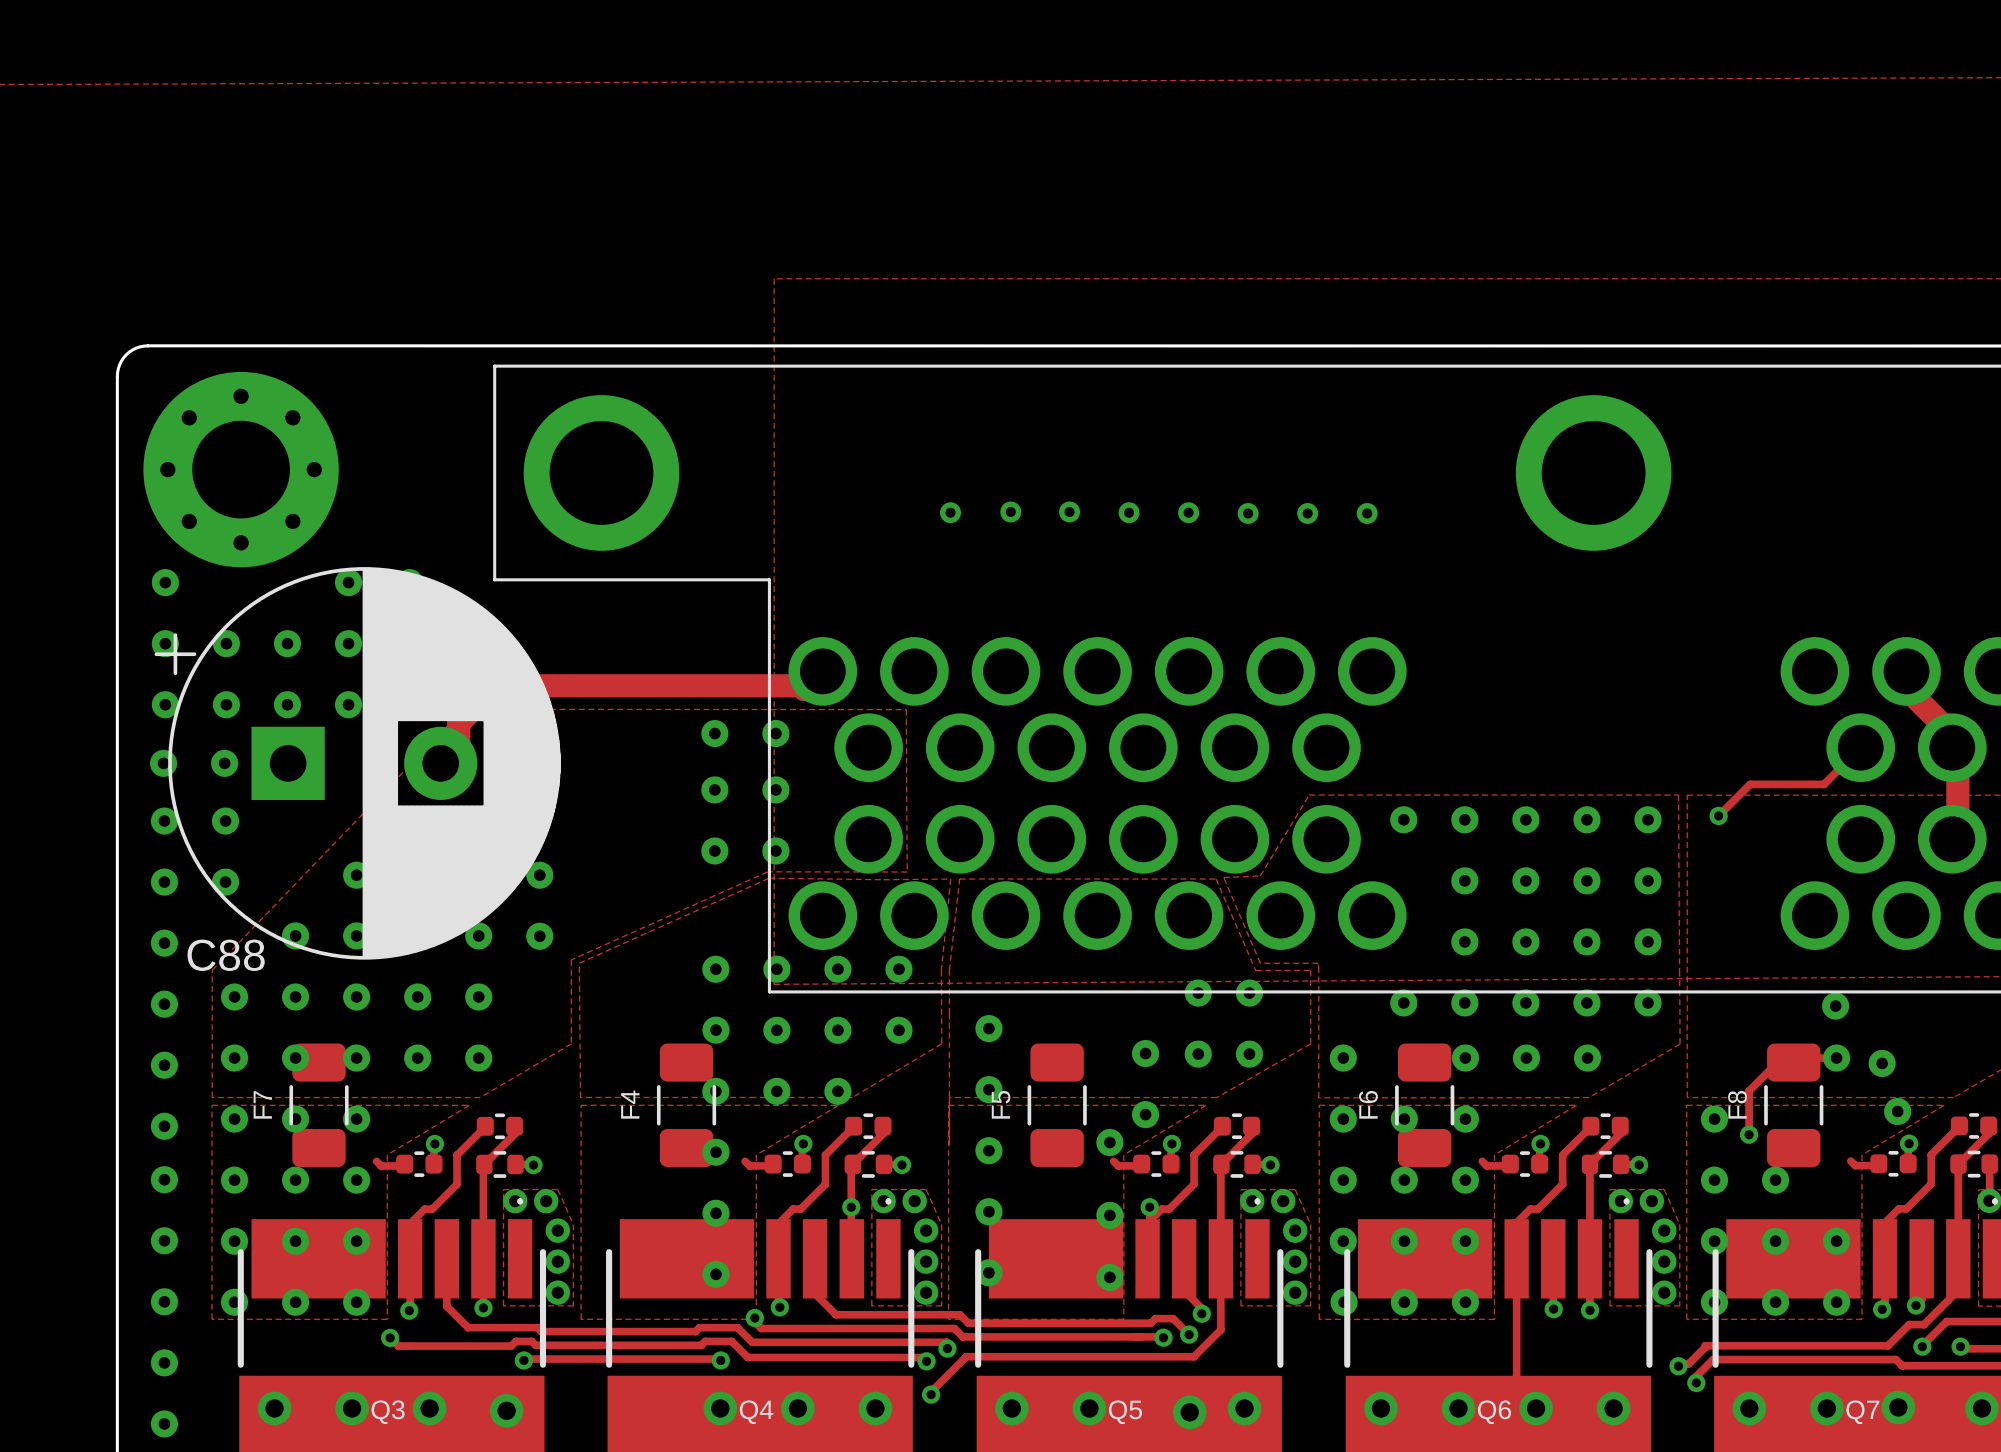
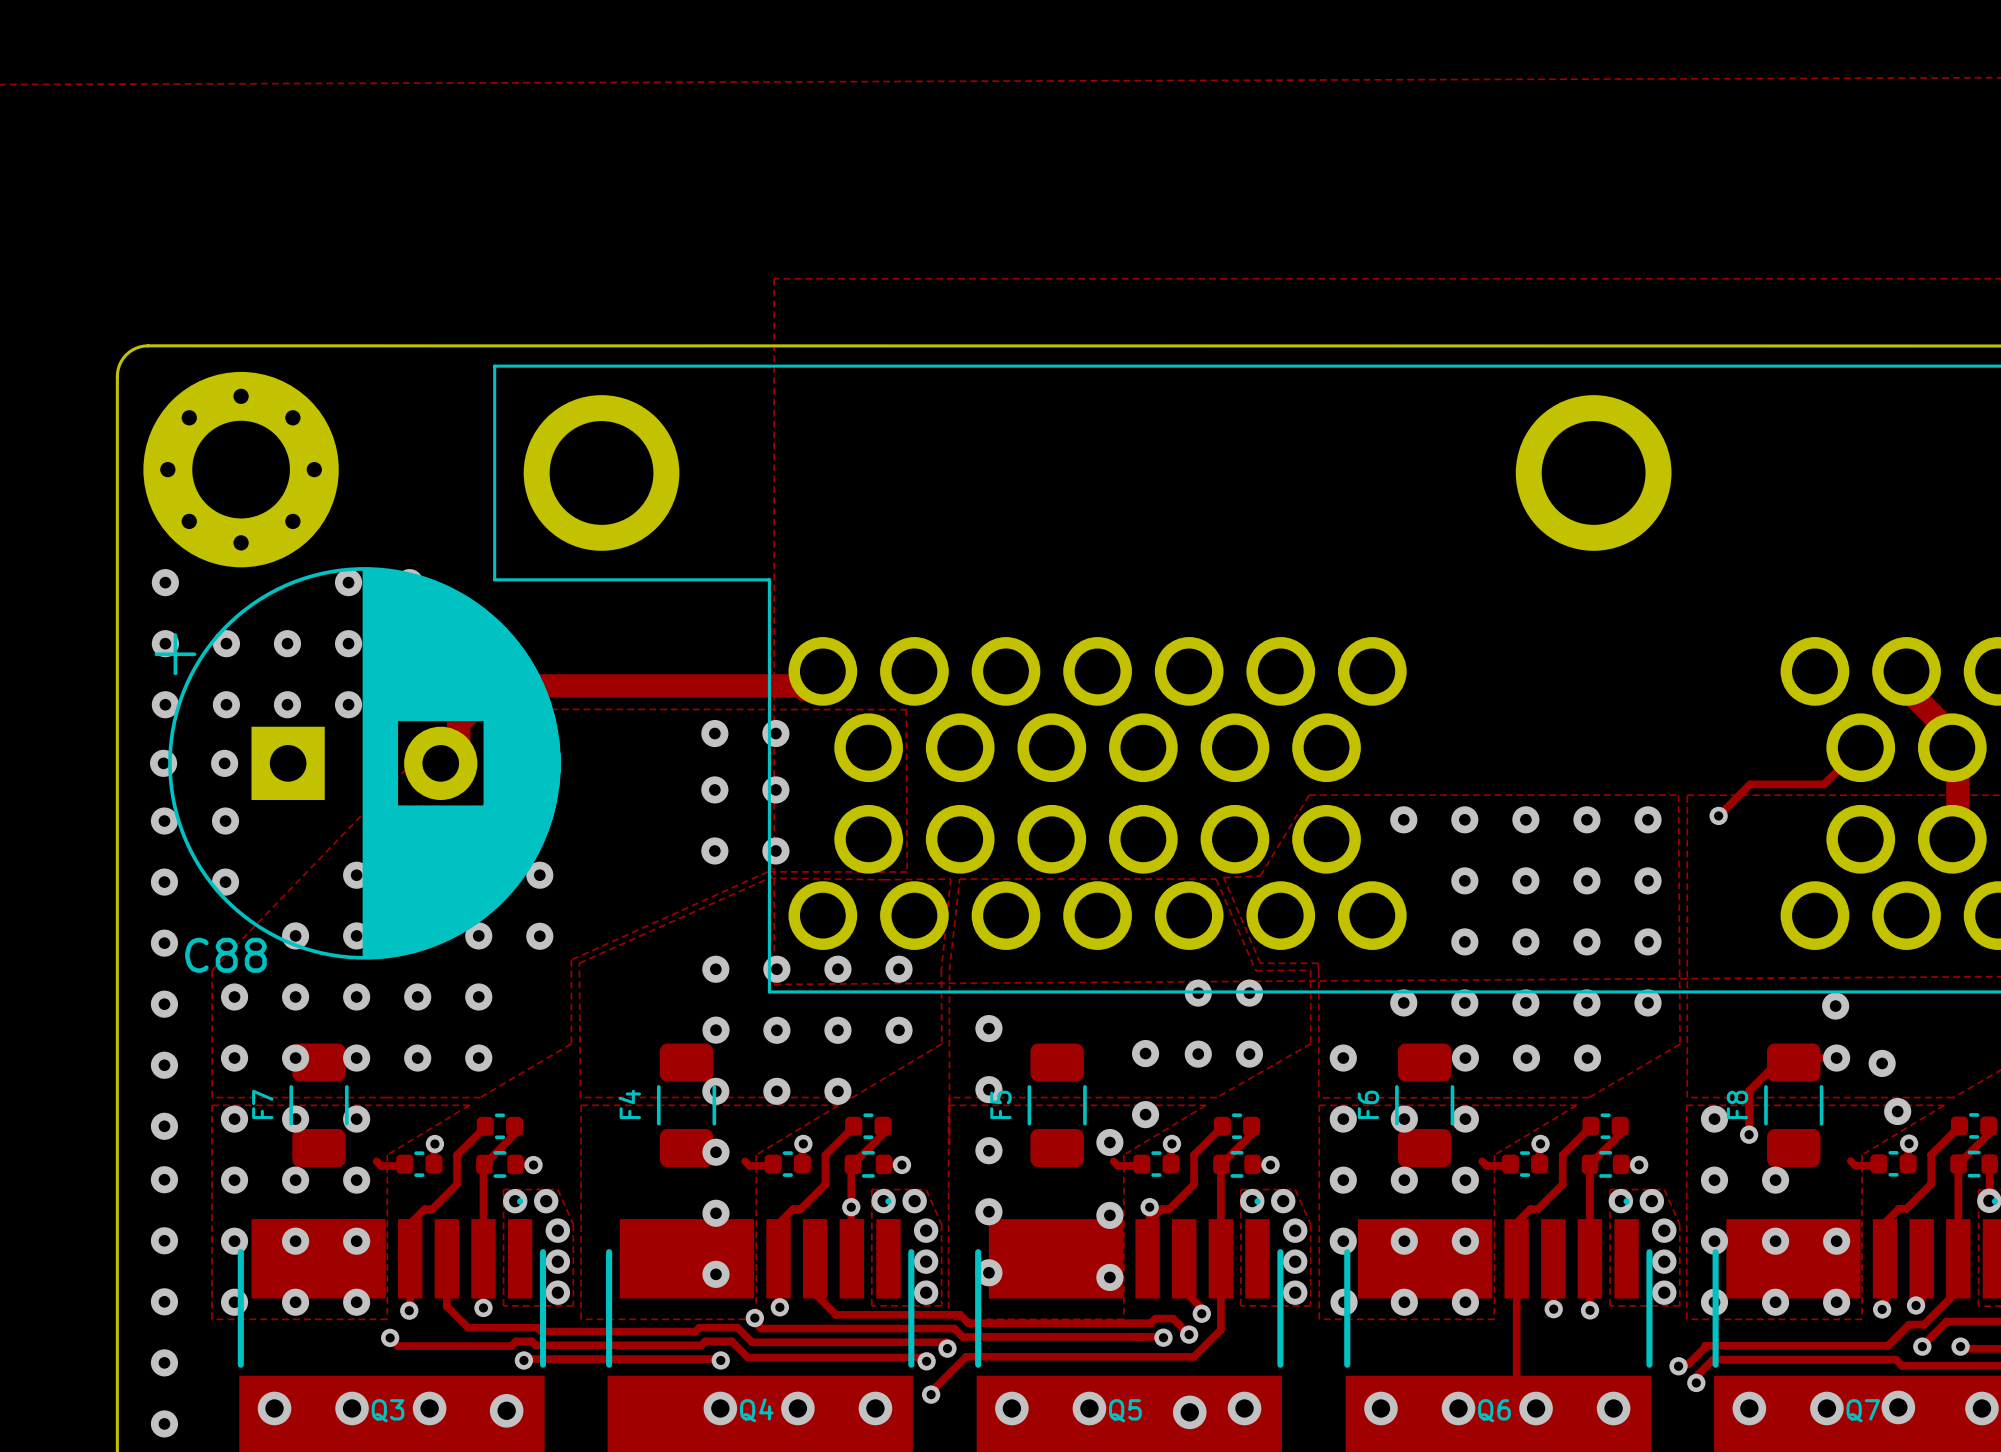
via: (1010, 511) -> none
via: (1069, 511) -> none
via: (950, 512) -> none
via: (1129, 512) -> none
via: (1188, 512) -> none
via: (1248, 513) -> none
via: (1307, 513) -> none
via: (1367, 513) -> none

